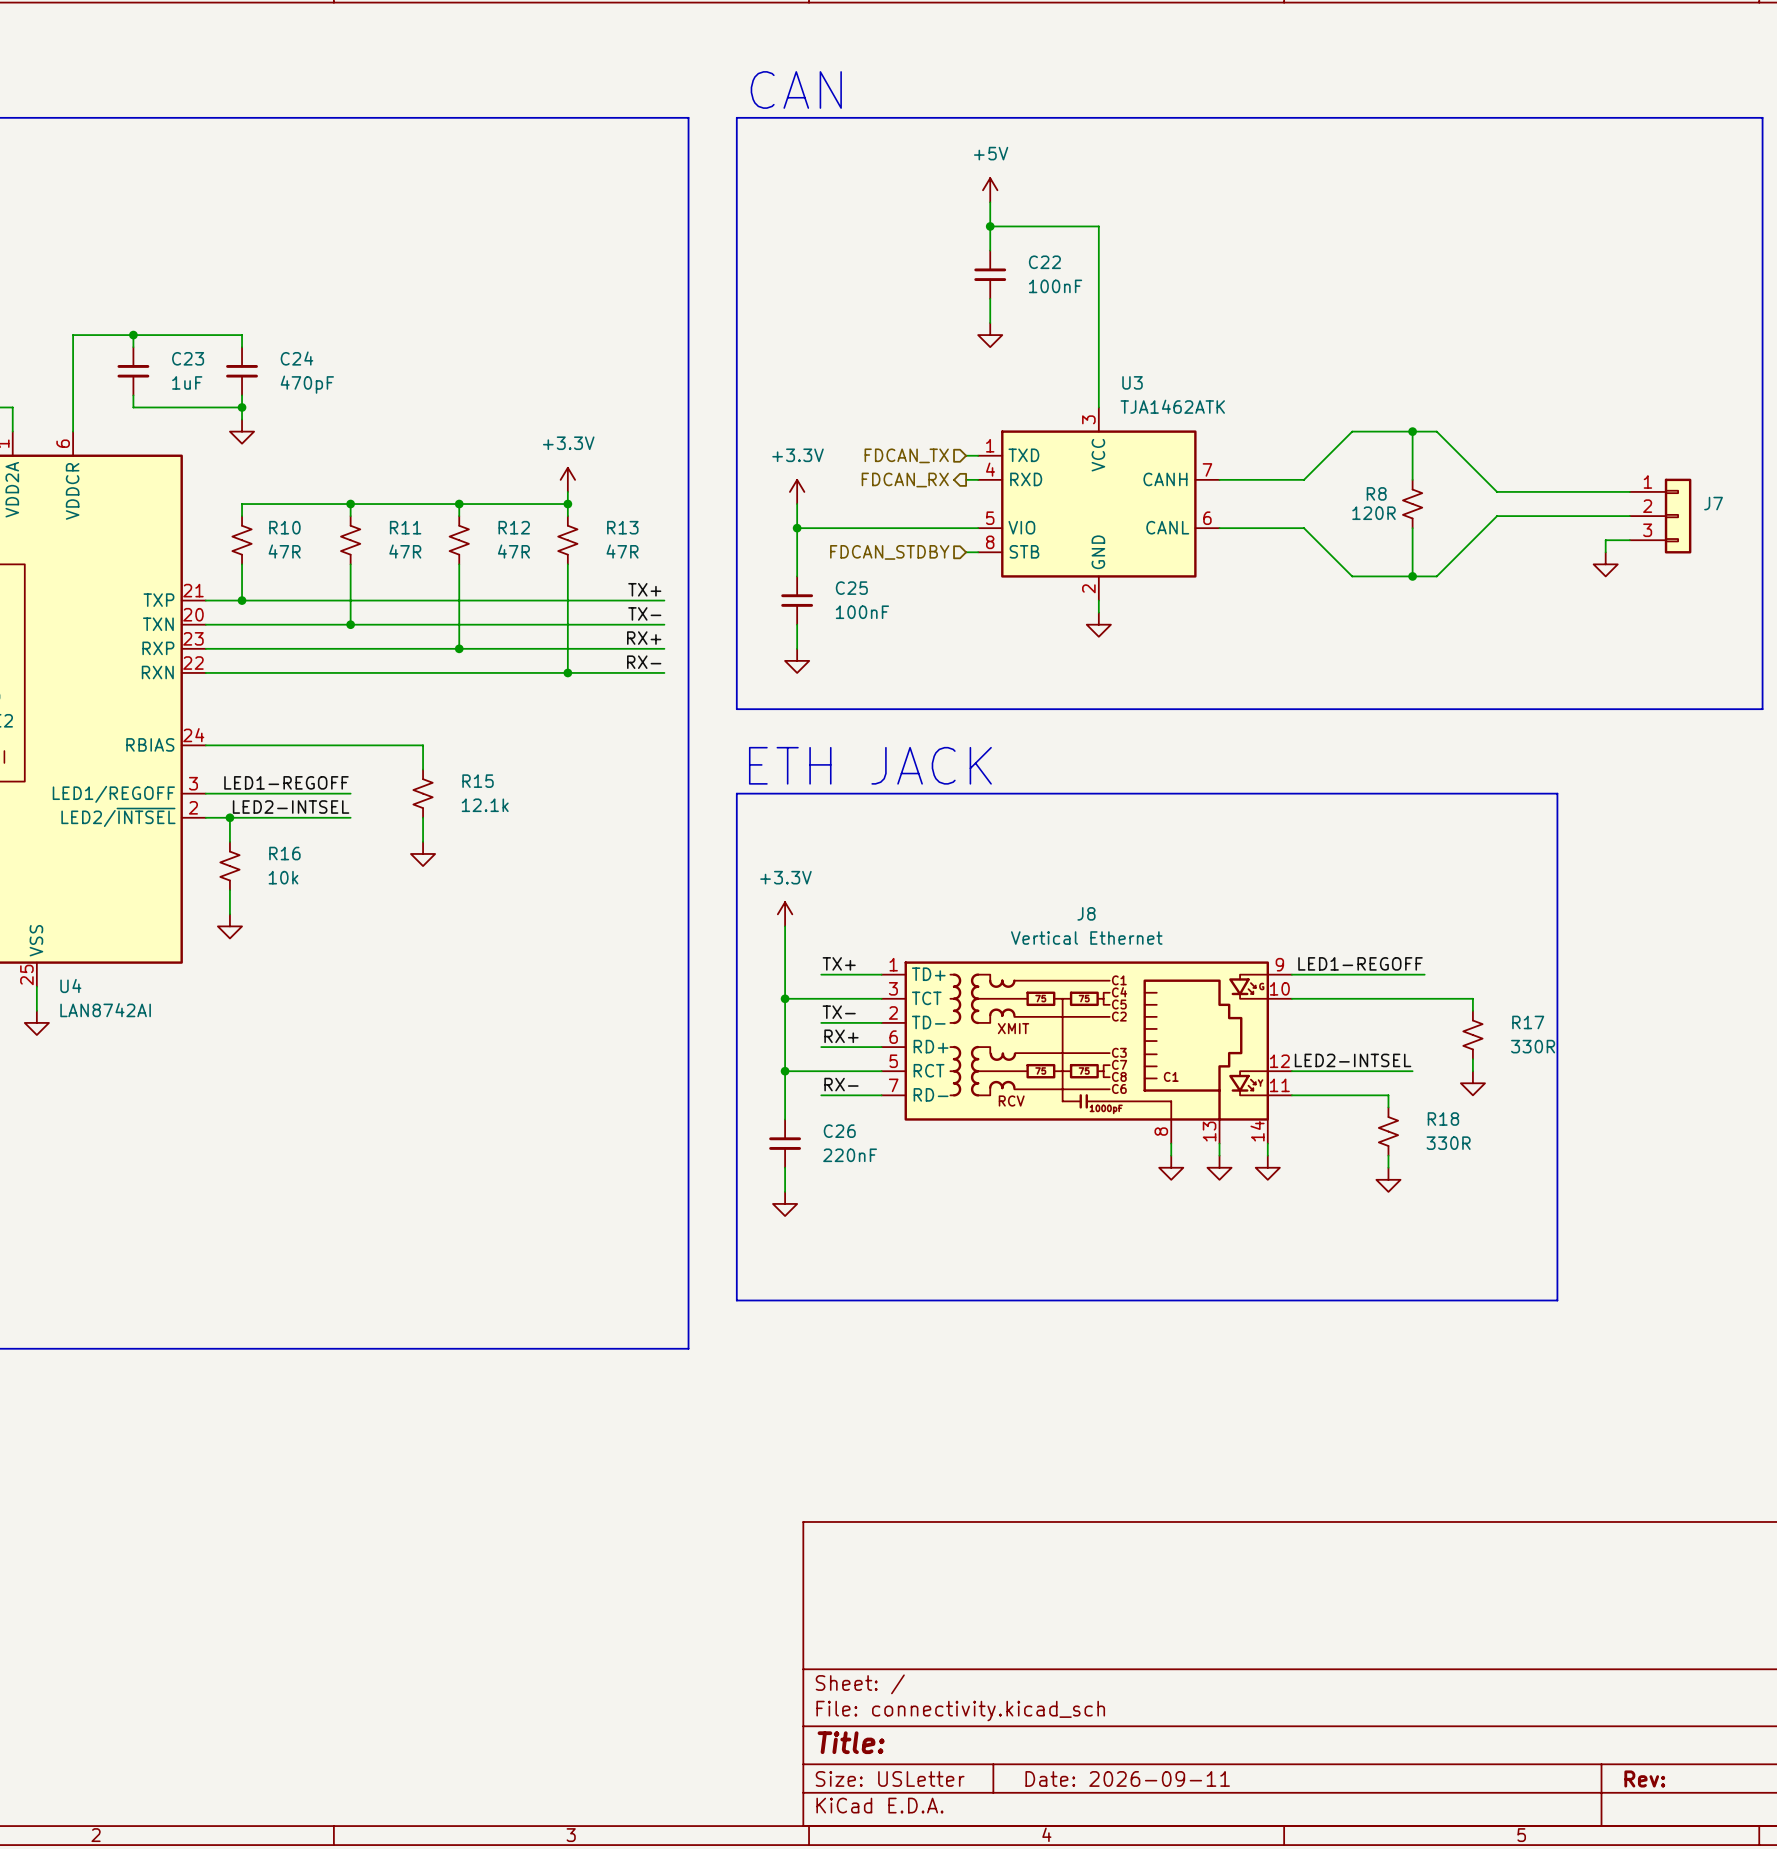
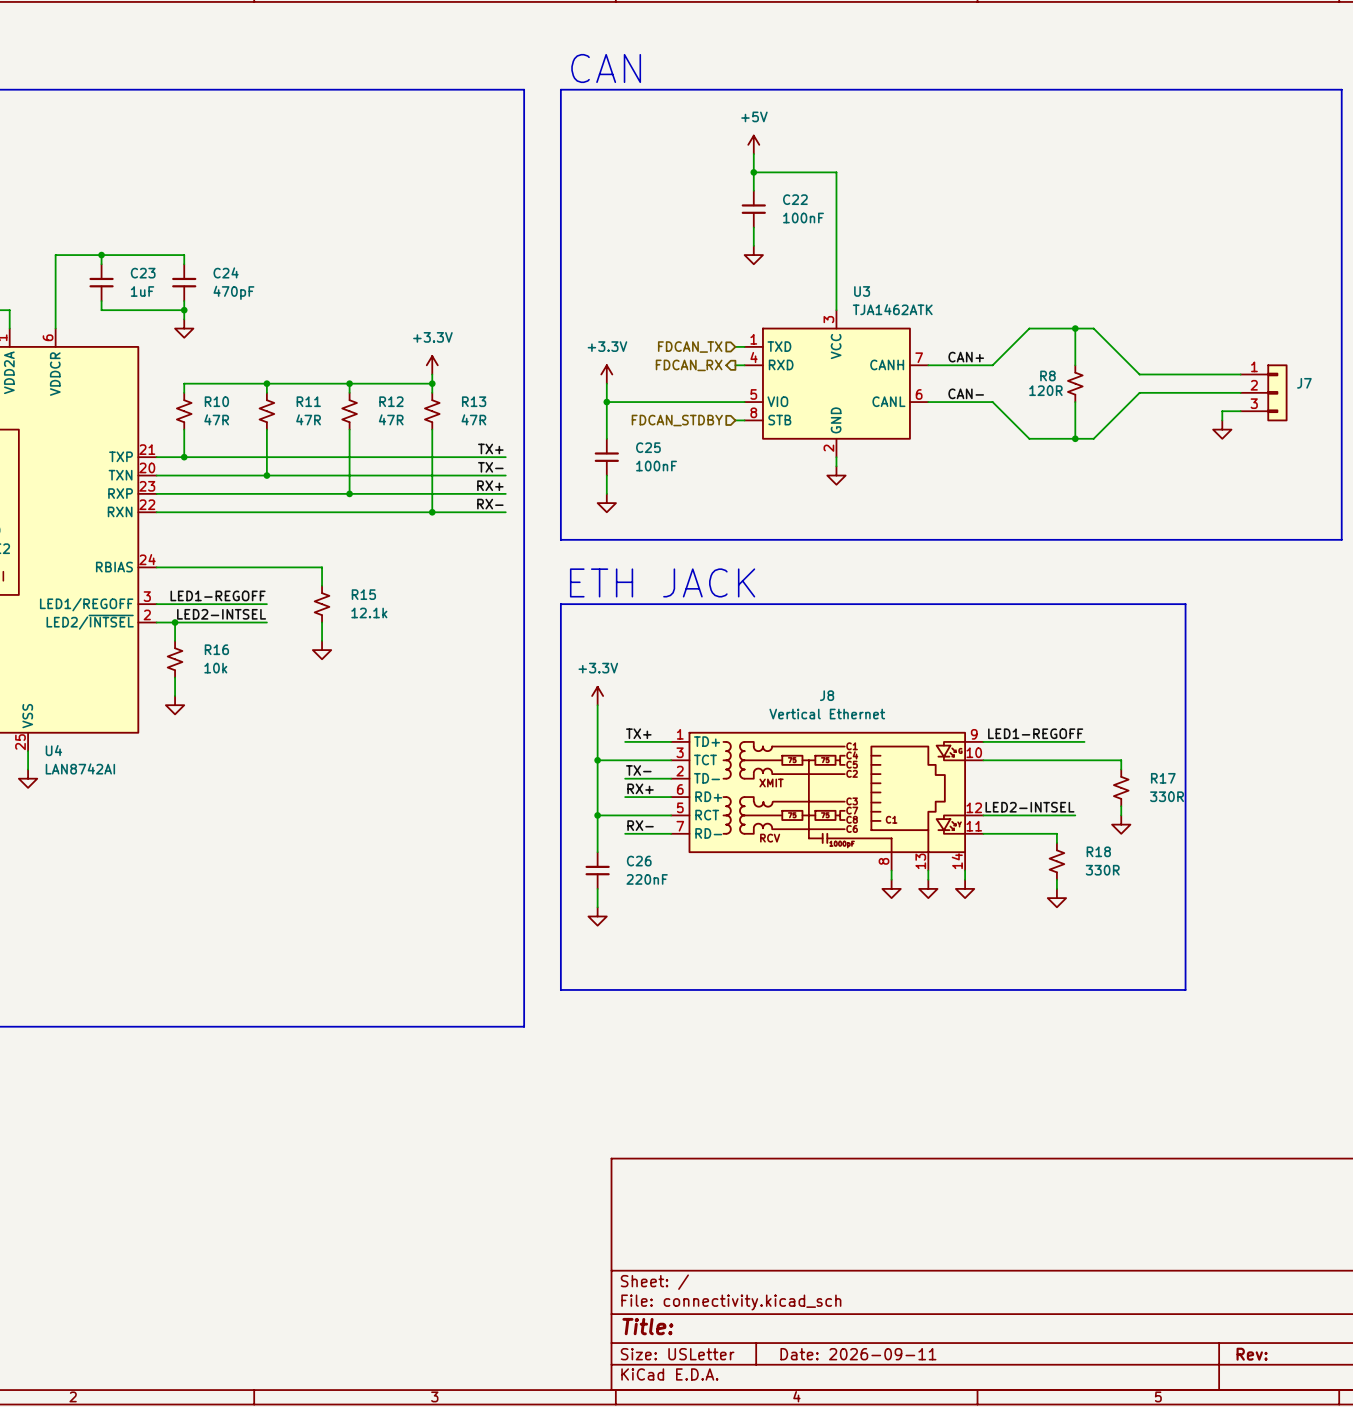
label: none -> CAN+ (966, 357)
label: none -> CAN- (966, 393)

